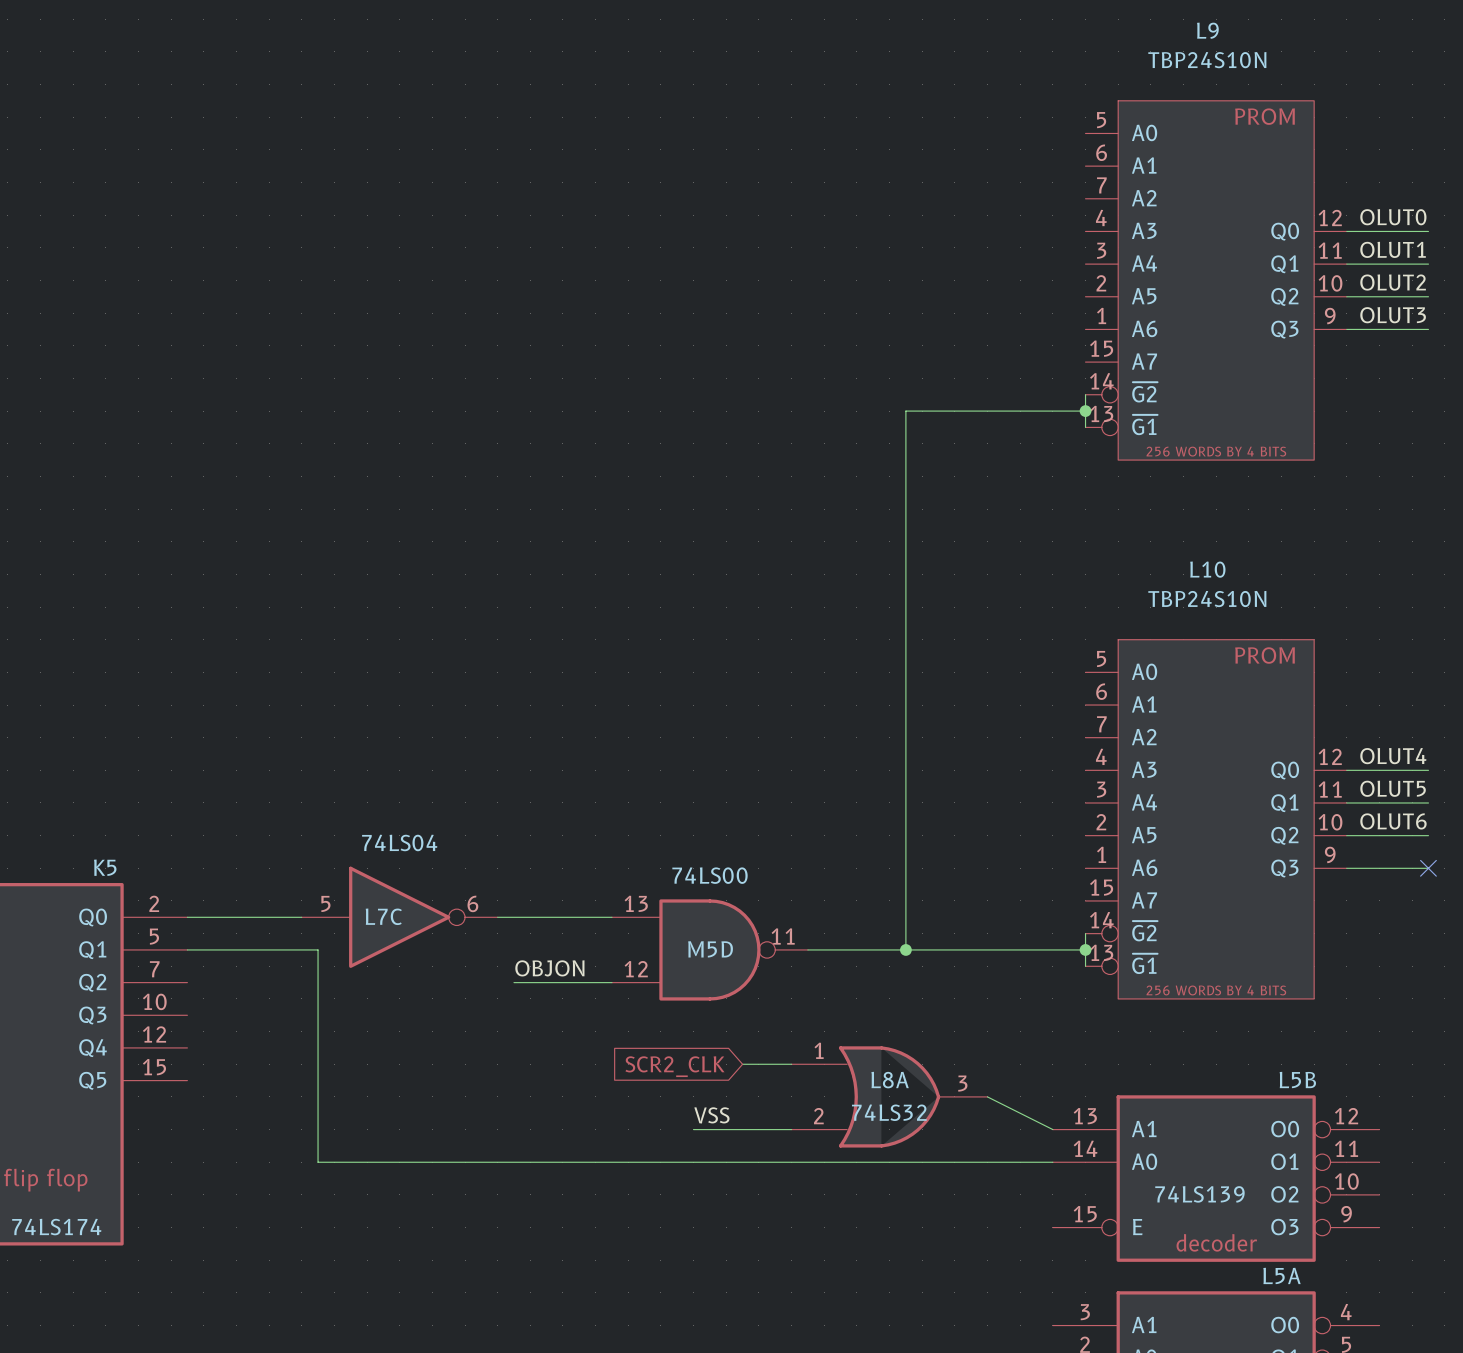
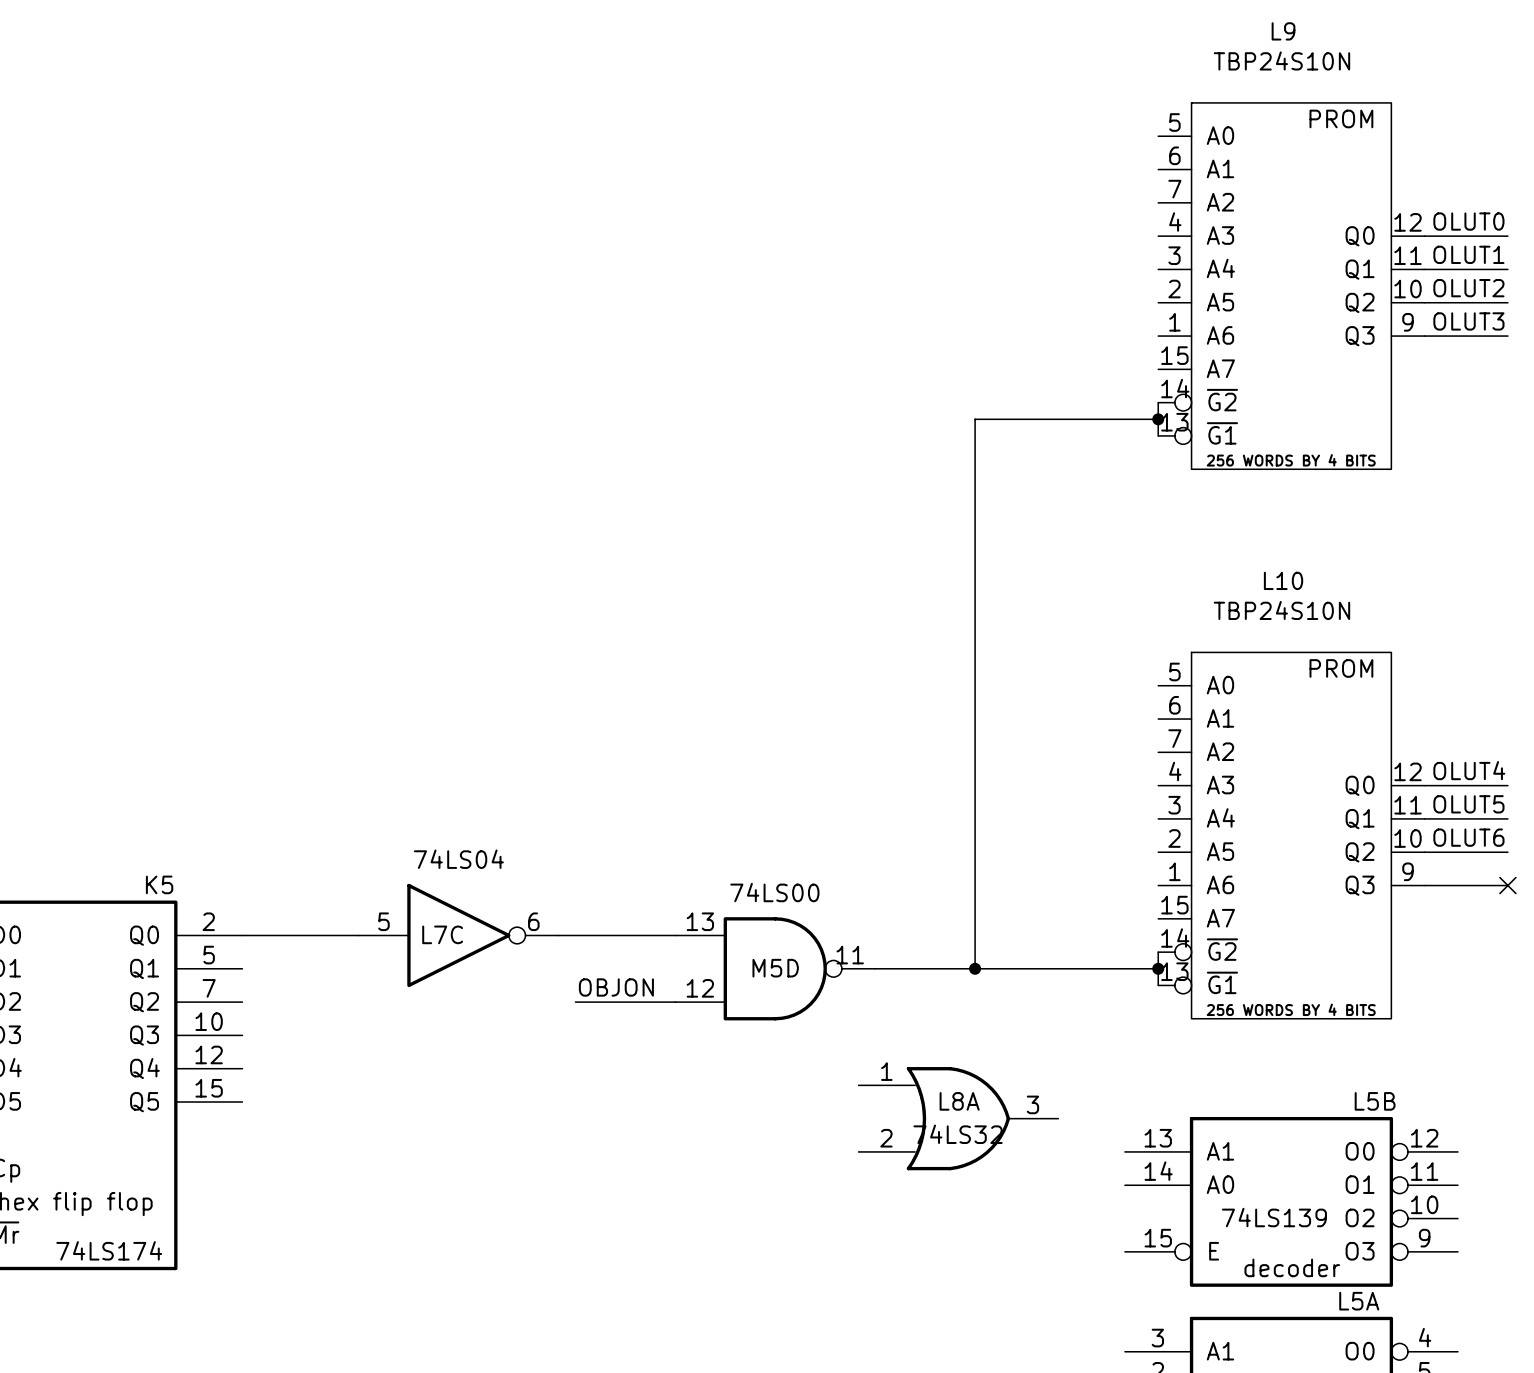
wire: (187, 949) (318, 949) (318, 1162) (1052, 1162) -> none
wire: (742, 1064) (791, 1064) -> none
global label: SCR2_CLK (674, 1066) -> none
wire: (987, 1096) (1052, 1129) -> none
label: VSS (711, 1115) -> none
wire: (693, 1129) (791, 1129) -> none

